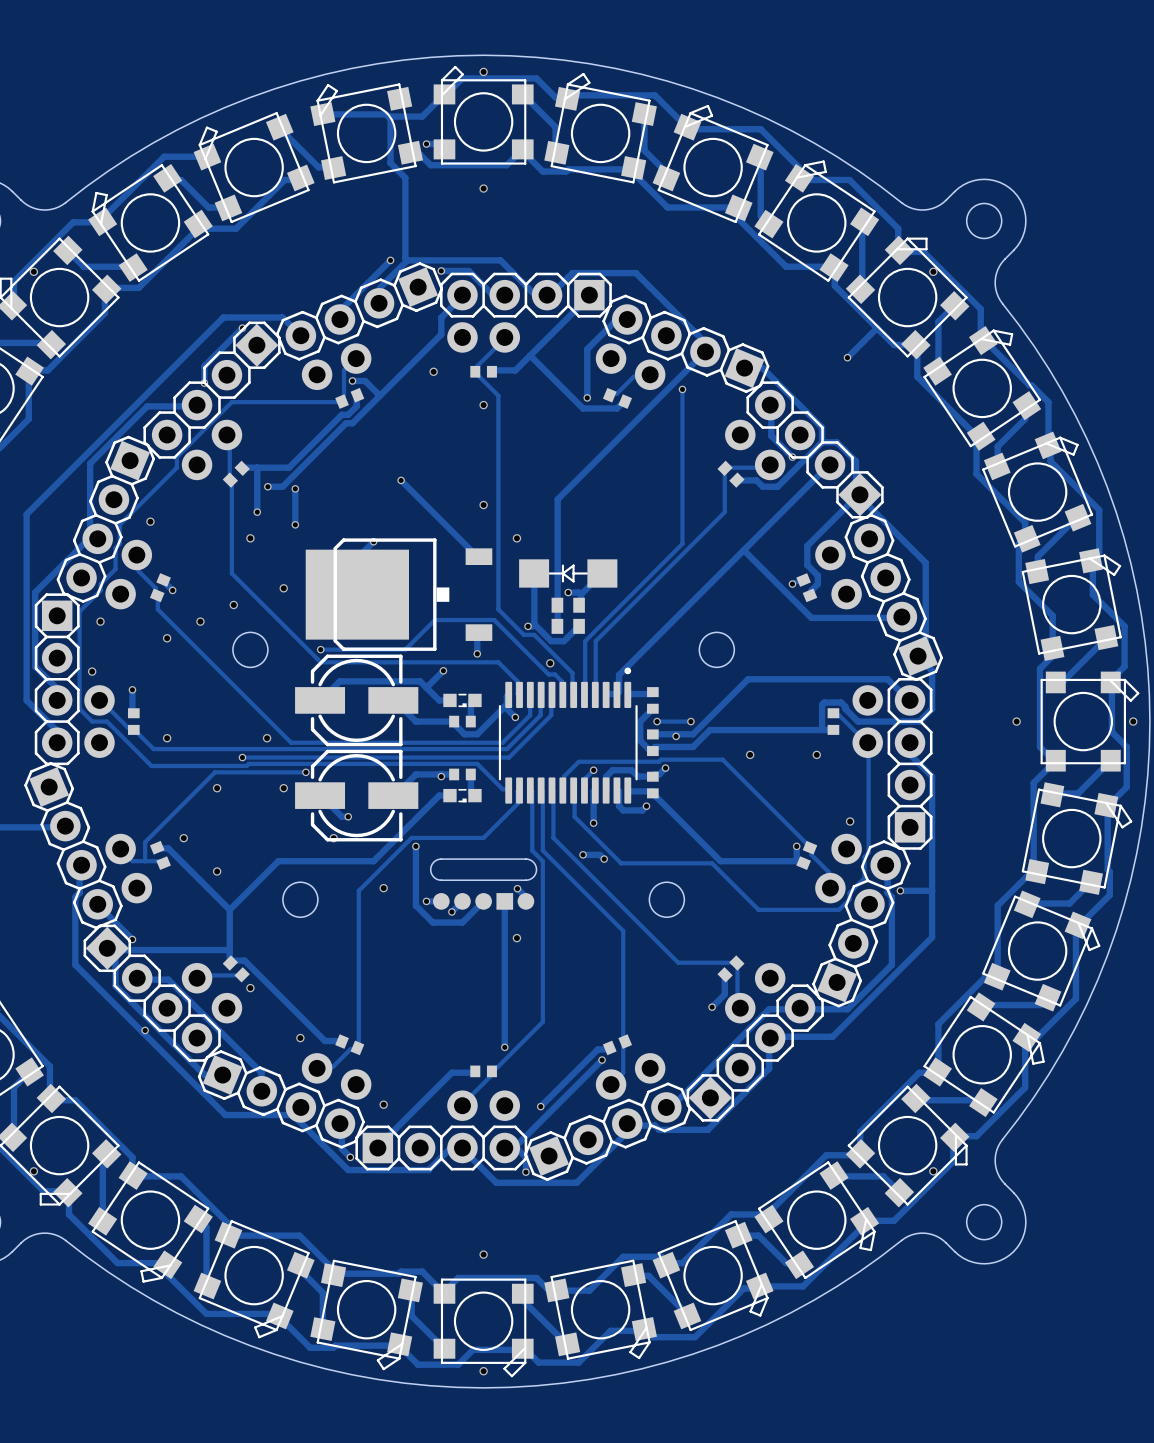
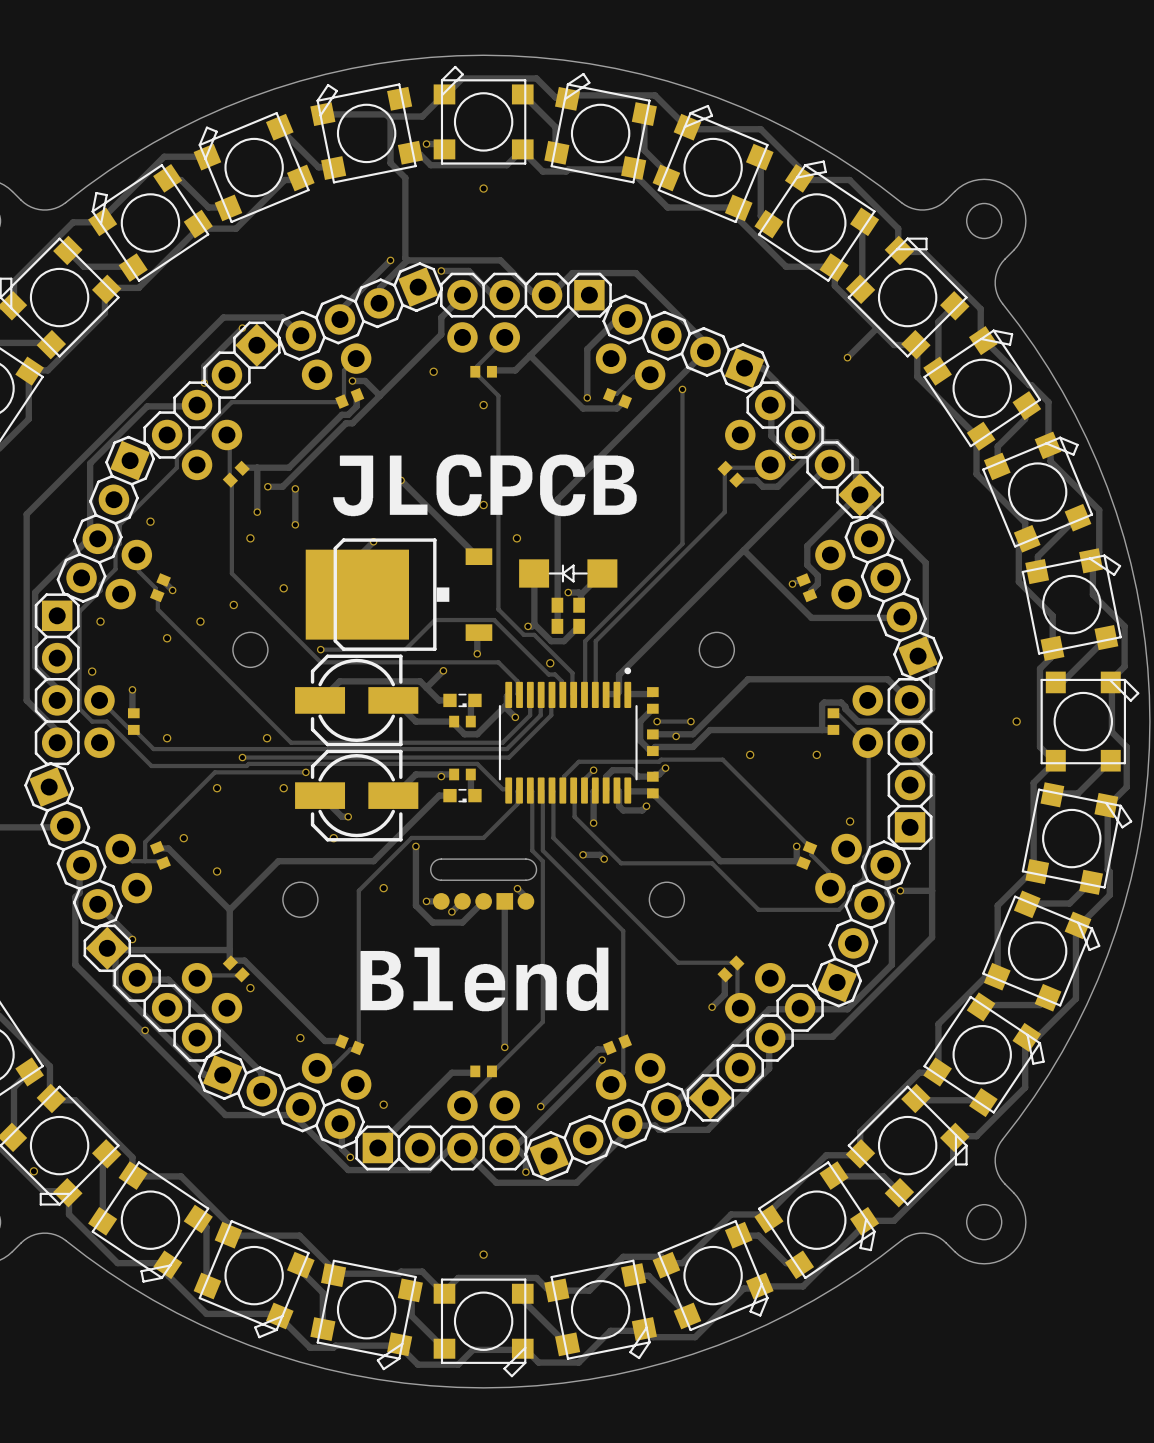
via: (483, 71) -> none
via: (33, 271) -> none
via: (933, 271) -> none
drawing: none -> [333, 454, 637, 517]
via: (1133, 721) -> none
via: (516, 938) -> none
drawing: none -> [360, 947, 609, 1012]
via: (933, 1171) -> none
via: (483, 1371) -> none

